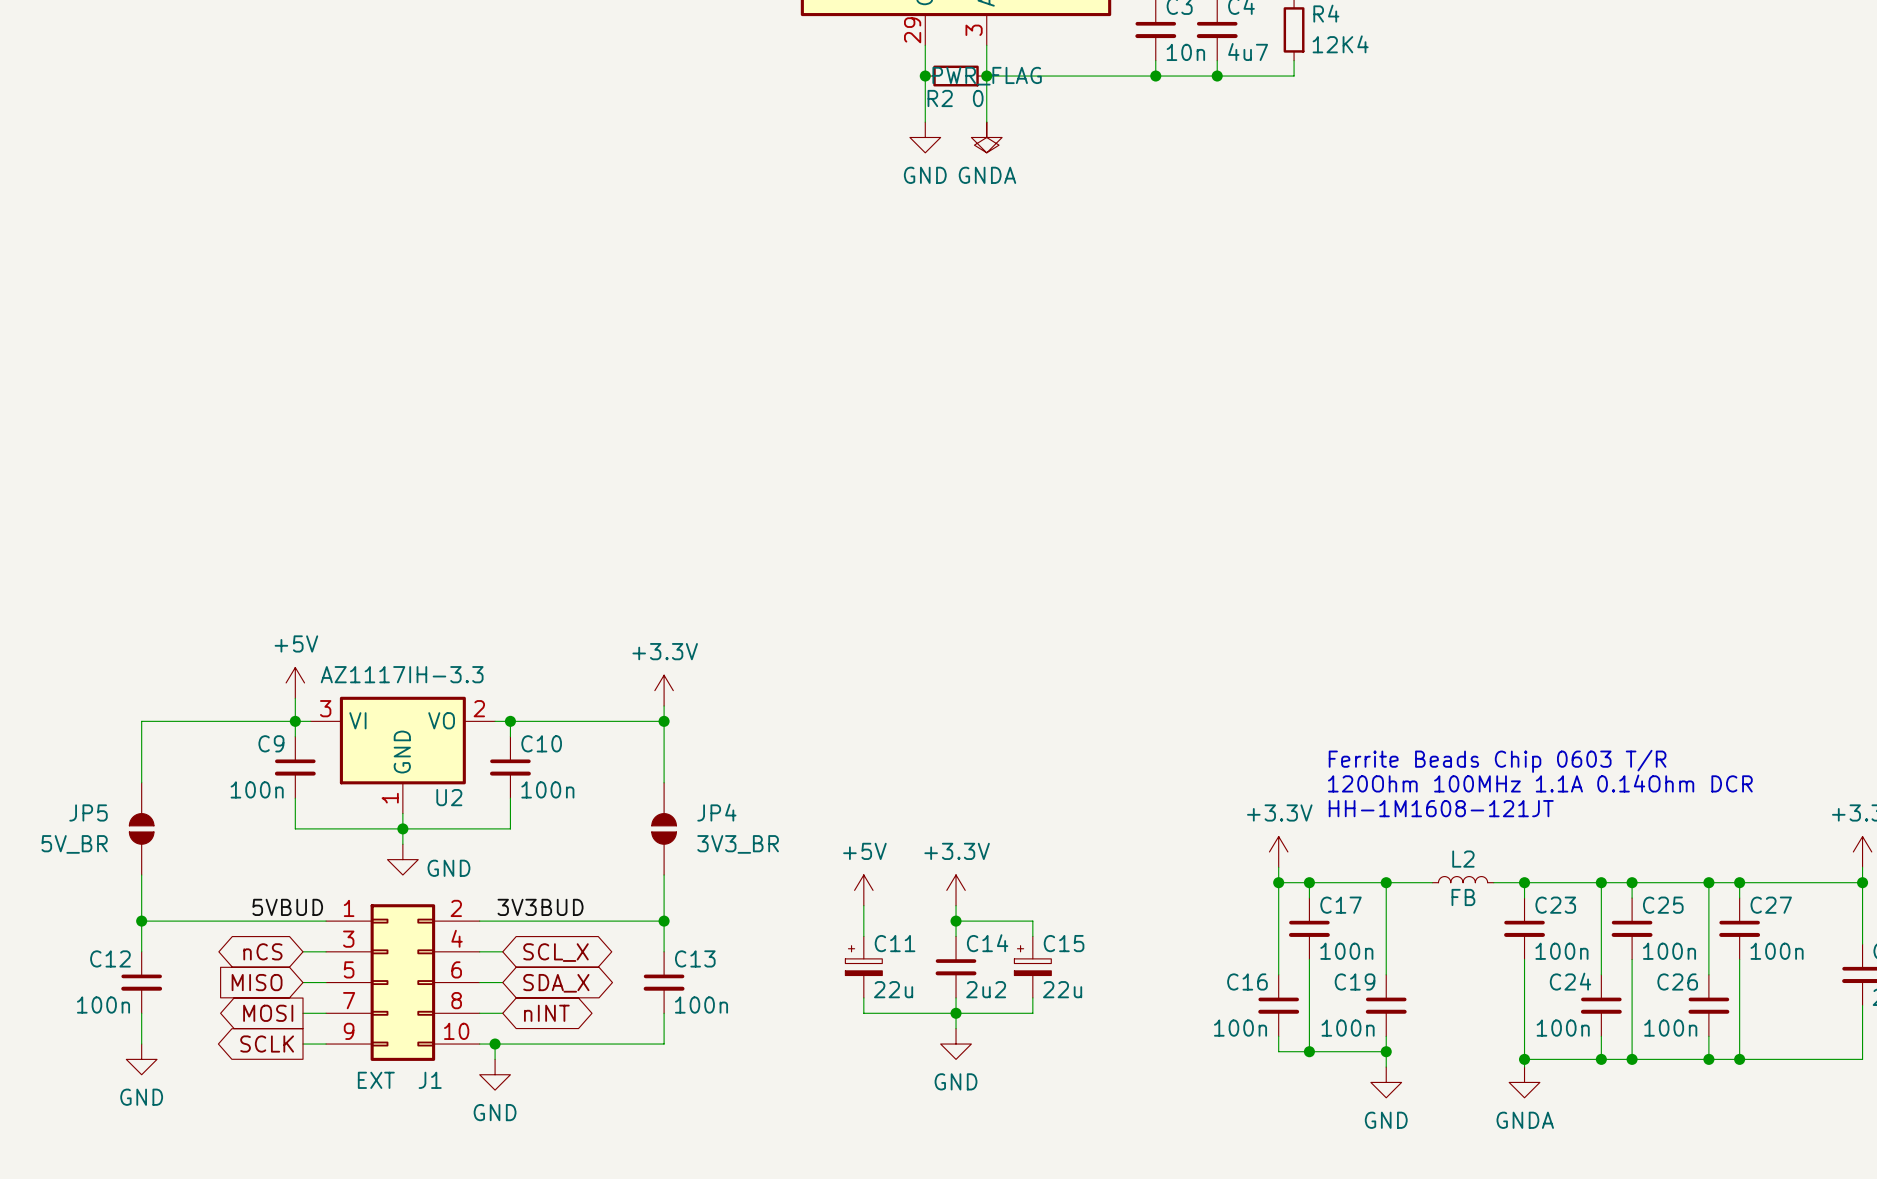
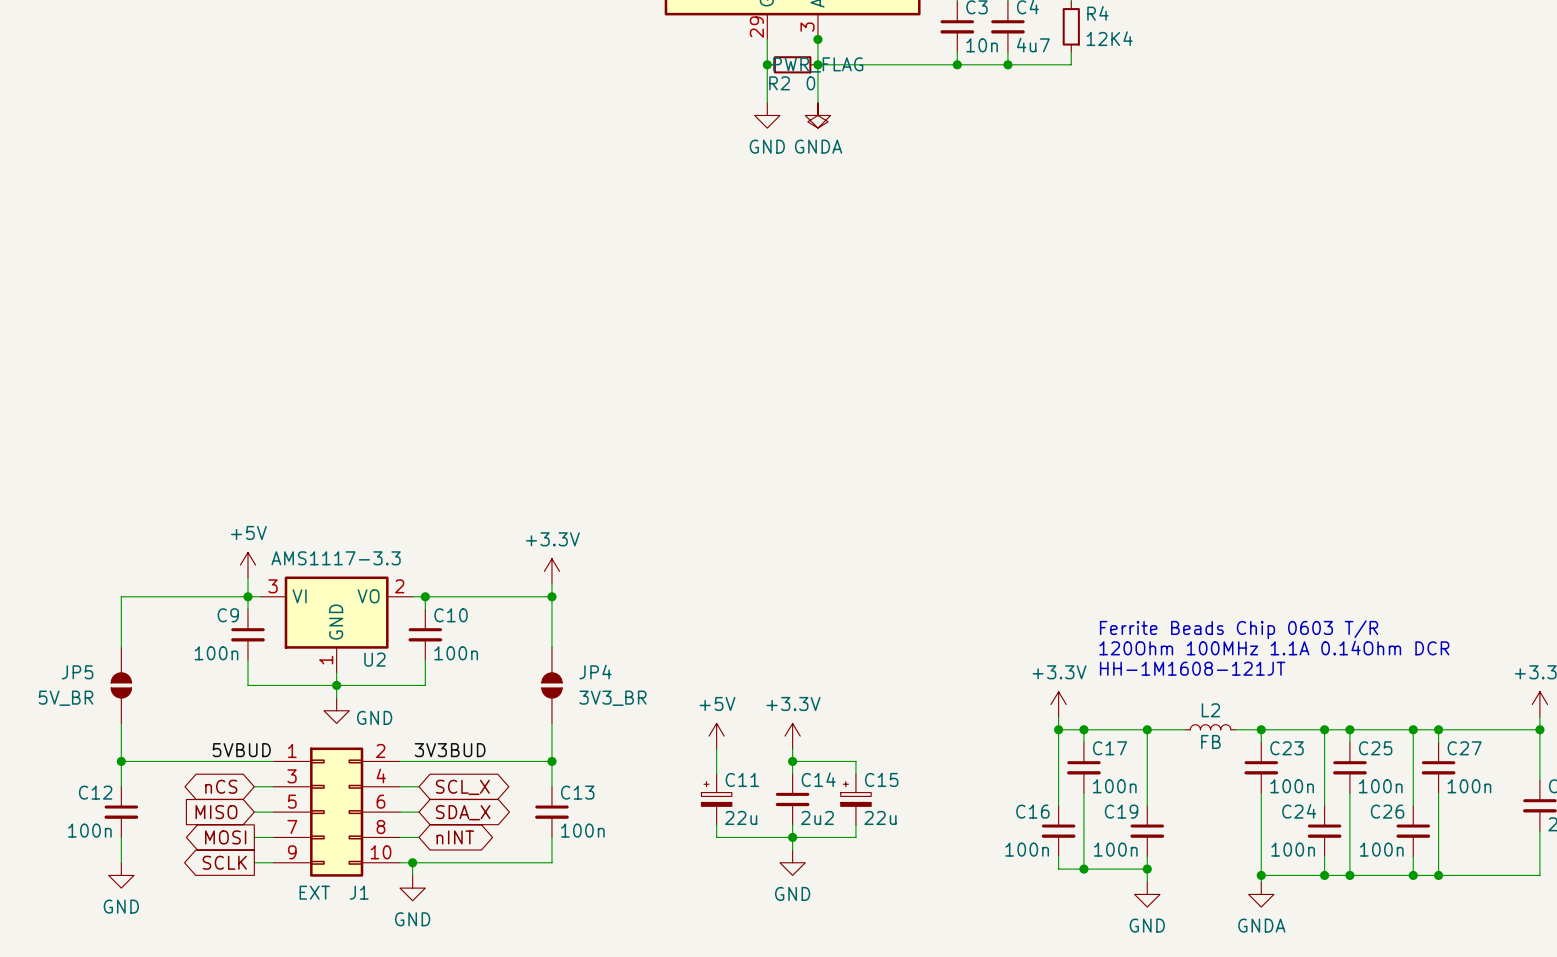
junction: none -> (817, 39)
U2 value: AZ1117IH-3.3 (402, 674) -> AMS1117-3.3 (336, 558)

